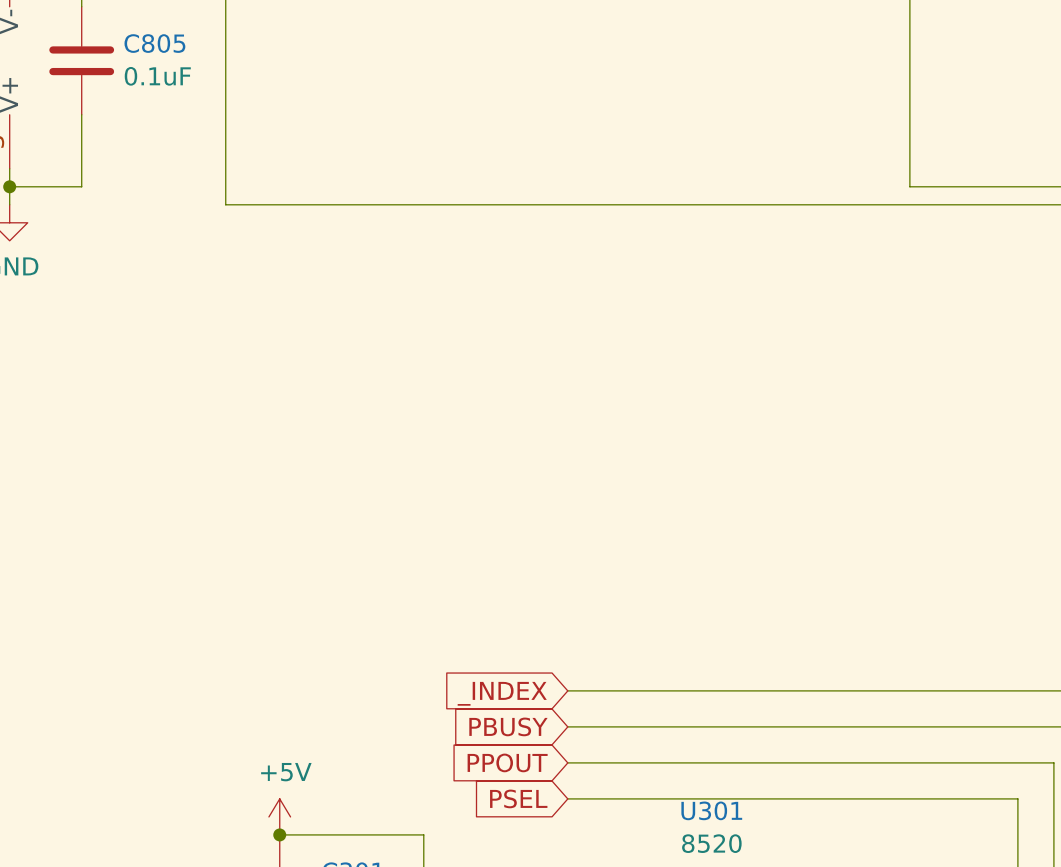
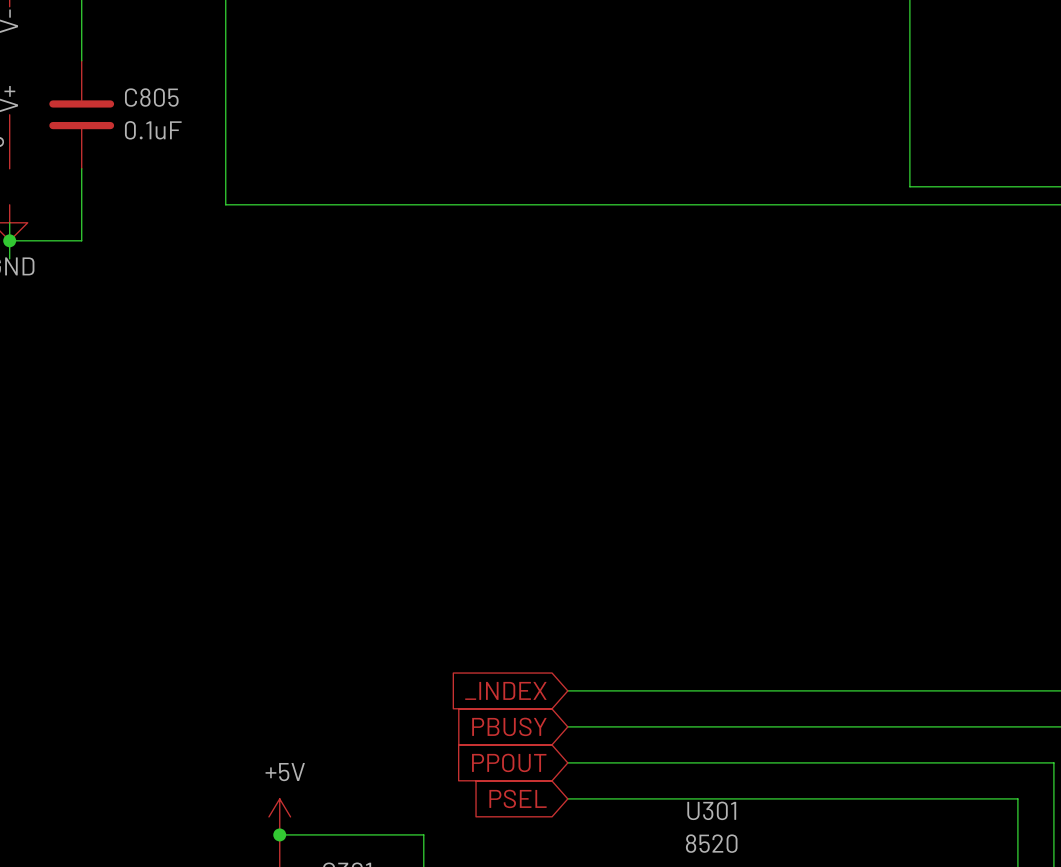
C805 position: (81, 60) -> (81, 114)
wire: (9, 168) (9, 204) -> (9, 222) (9, 258)
wire: (9, 186) (81, 186) -> (9, 240) (81, 240) (81, 186)
junction position: (9, 186) -> (9, 240)

